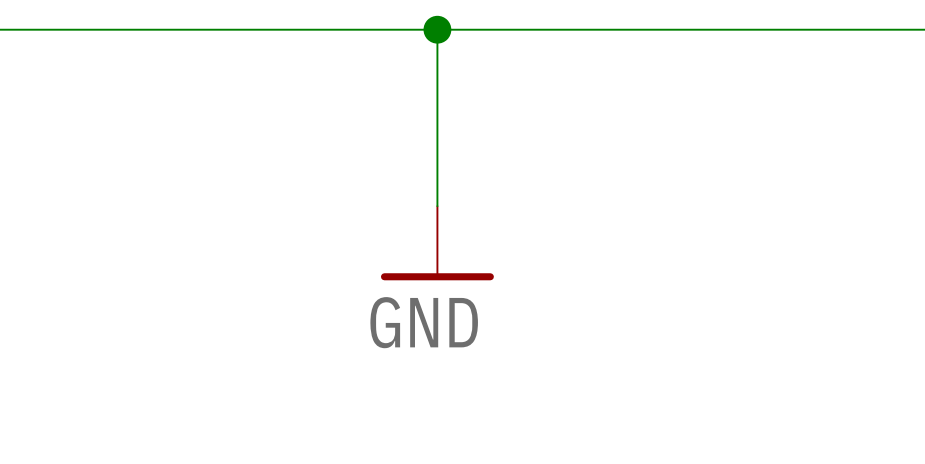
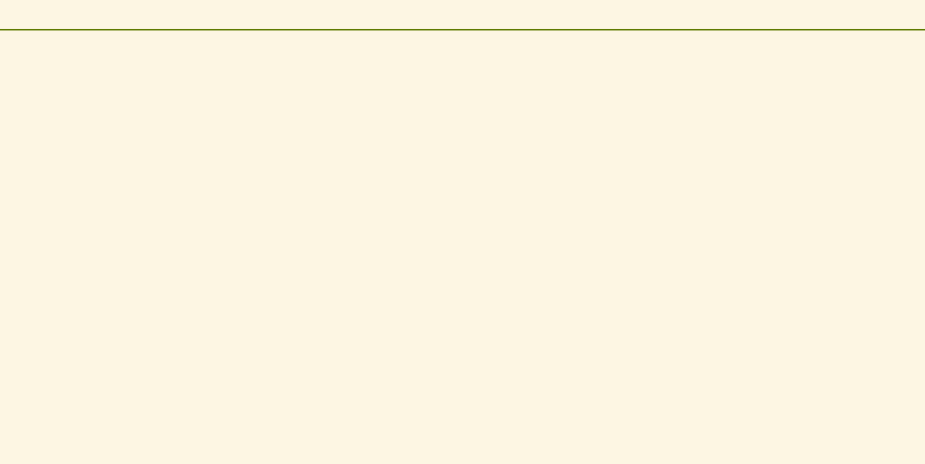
wire: (437, 29) (437, 206) -> none
junction: (437, 29) -> none
power symbol: GND (437, 243) -> none

